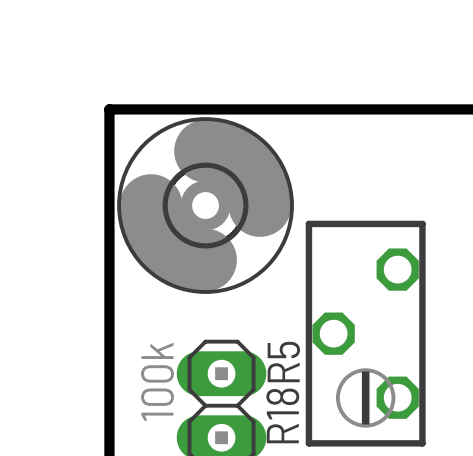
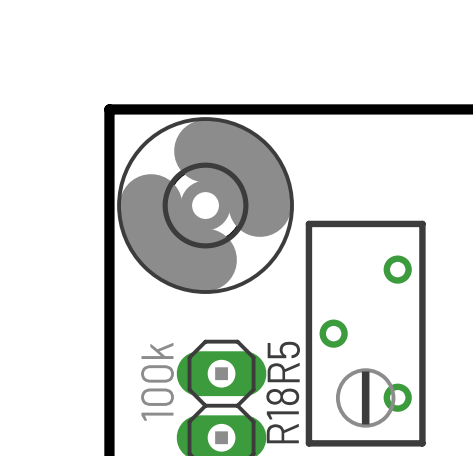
R18 footprint: [305, 220, 426, 447] -> [305, 220, 426, 447]

